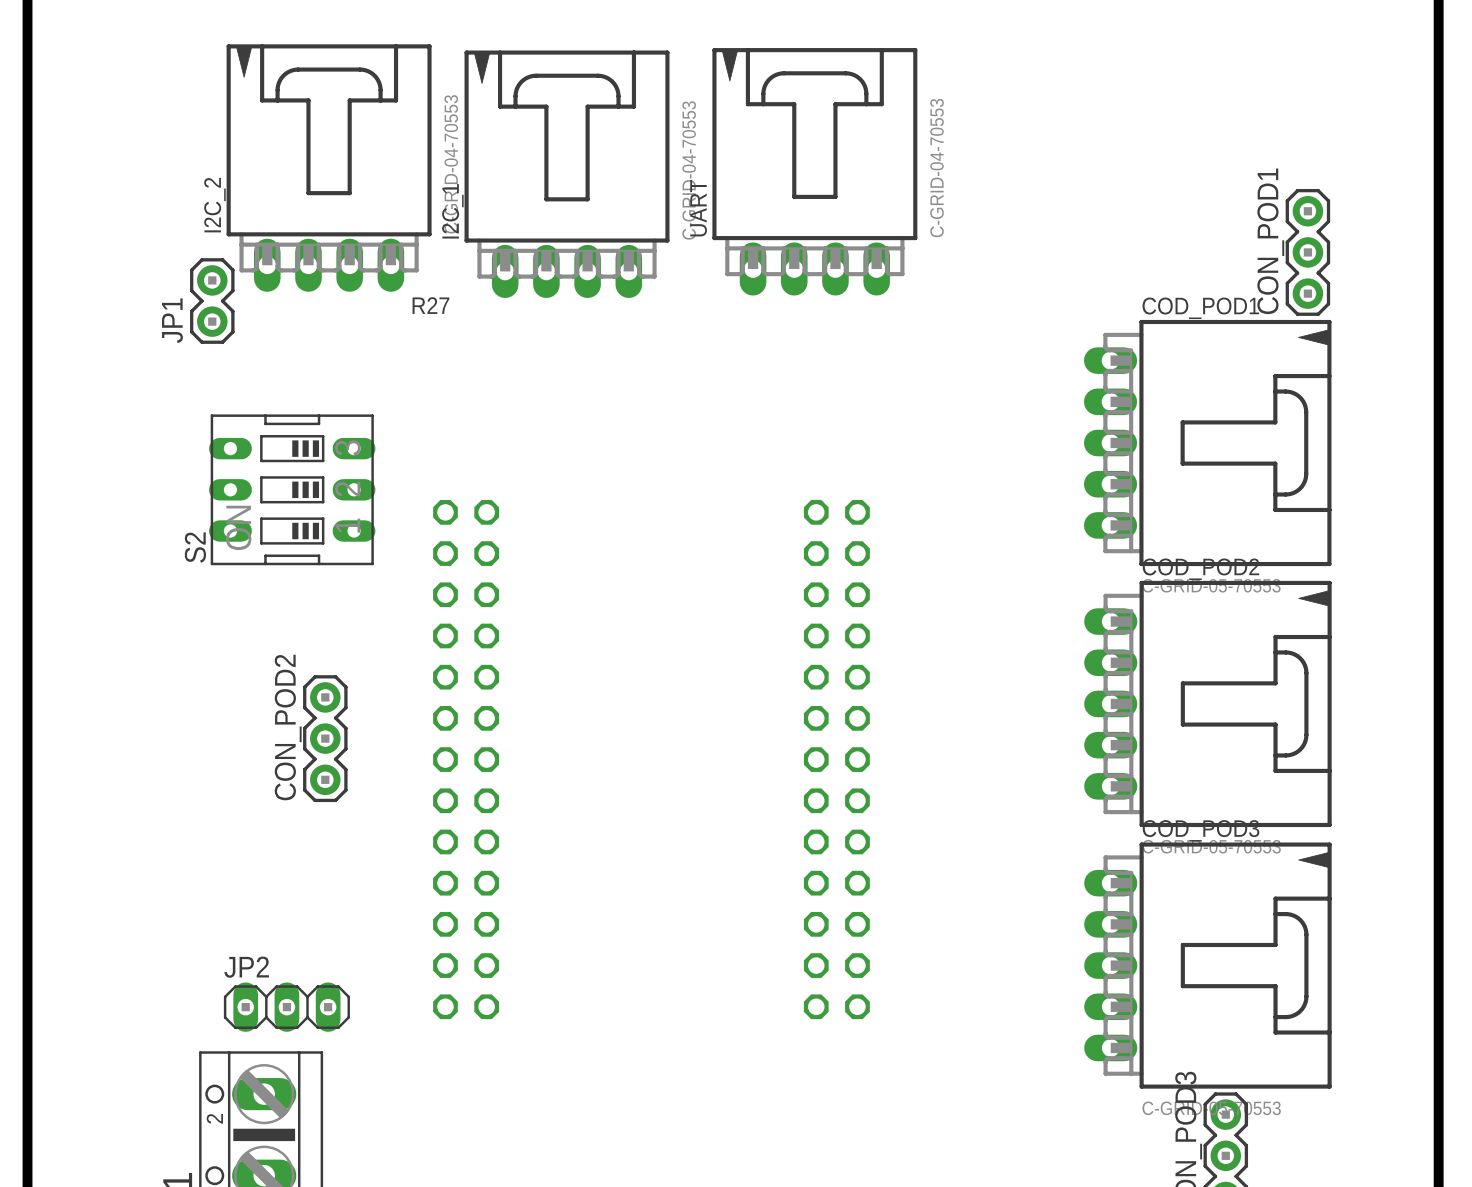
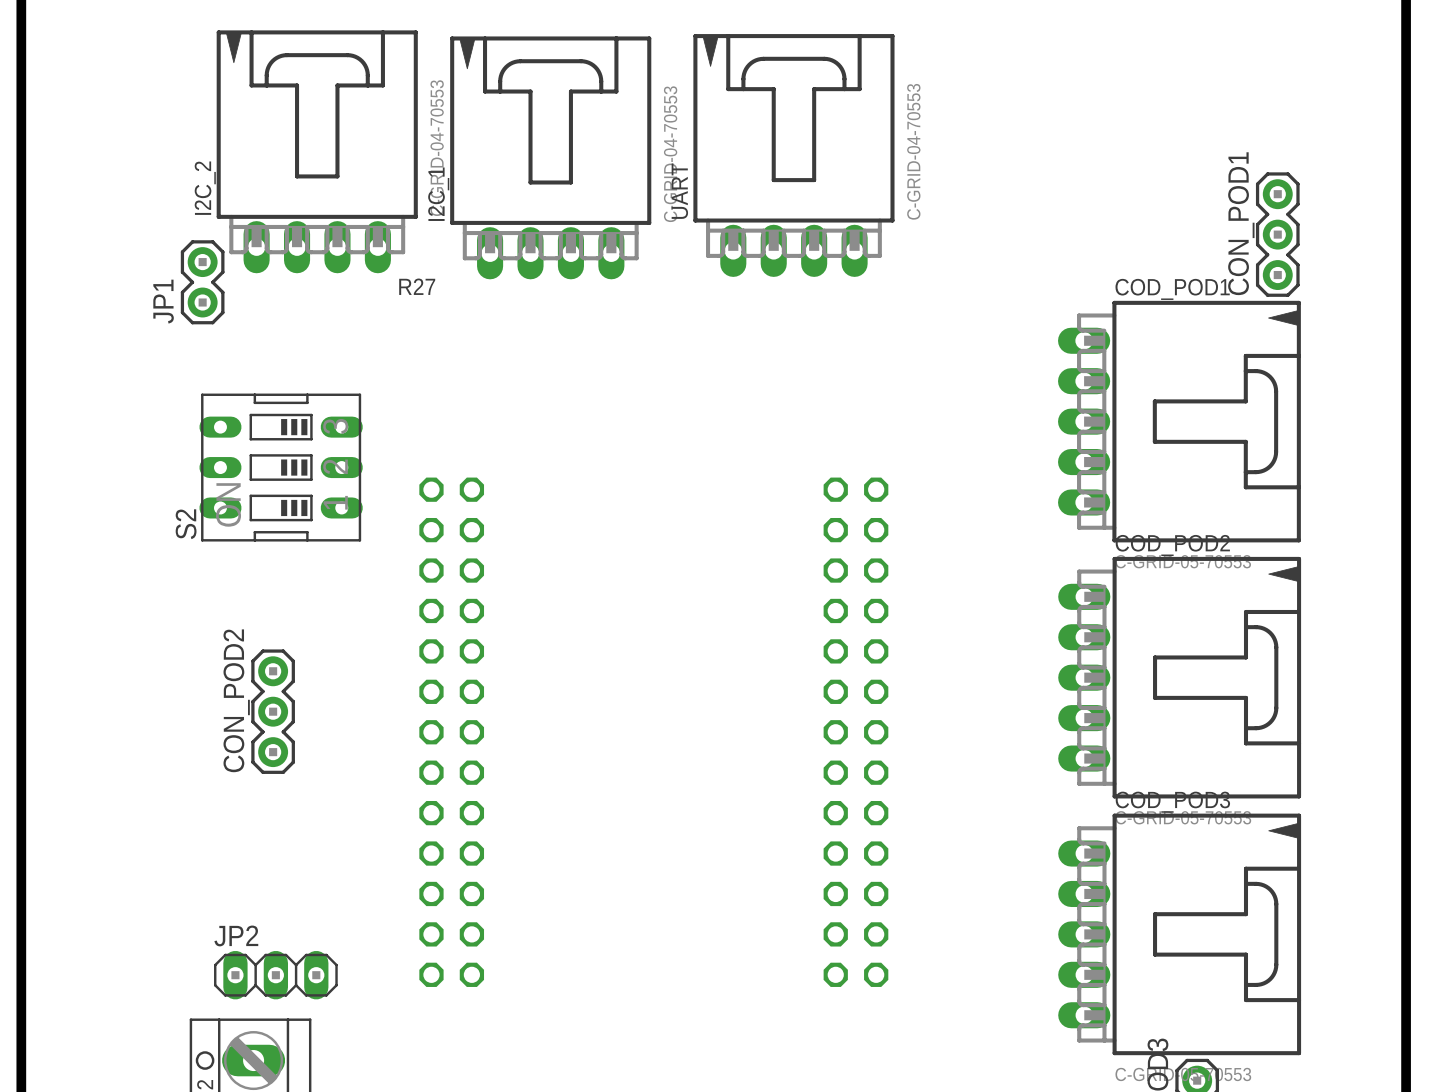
CON_POD2 position: (325, 738) -> (273, 711)
part position: (836, 759) -> (855, 732)

